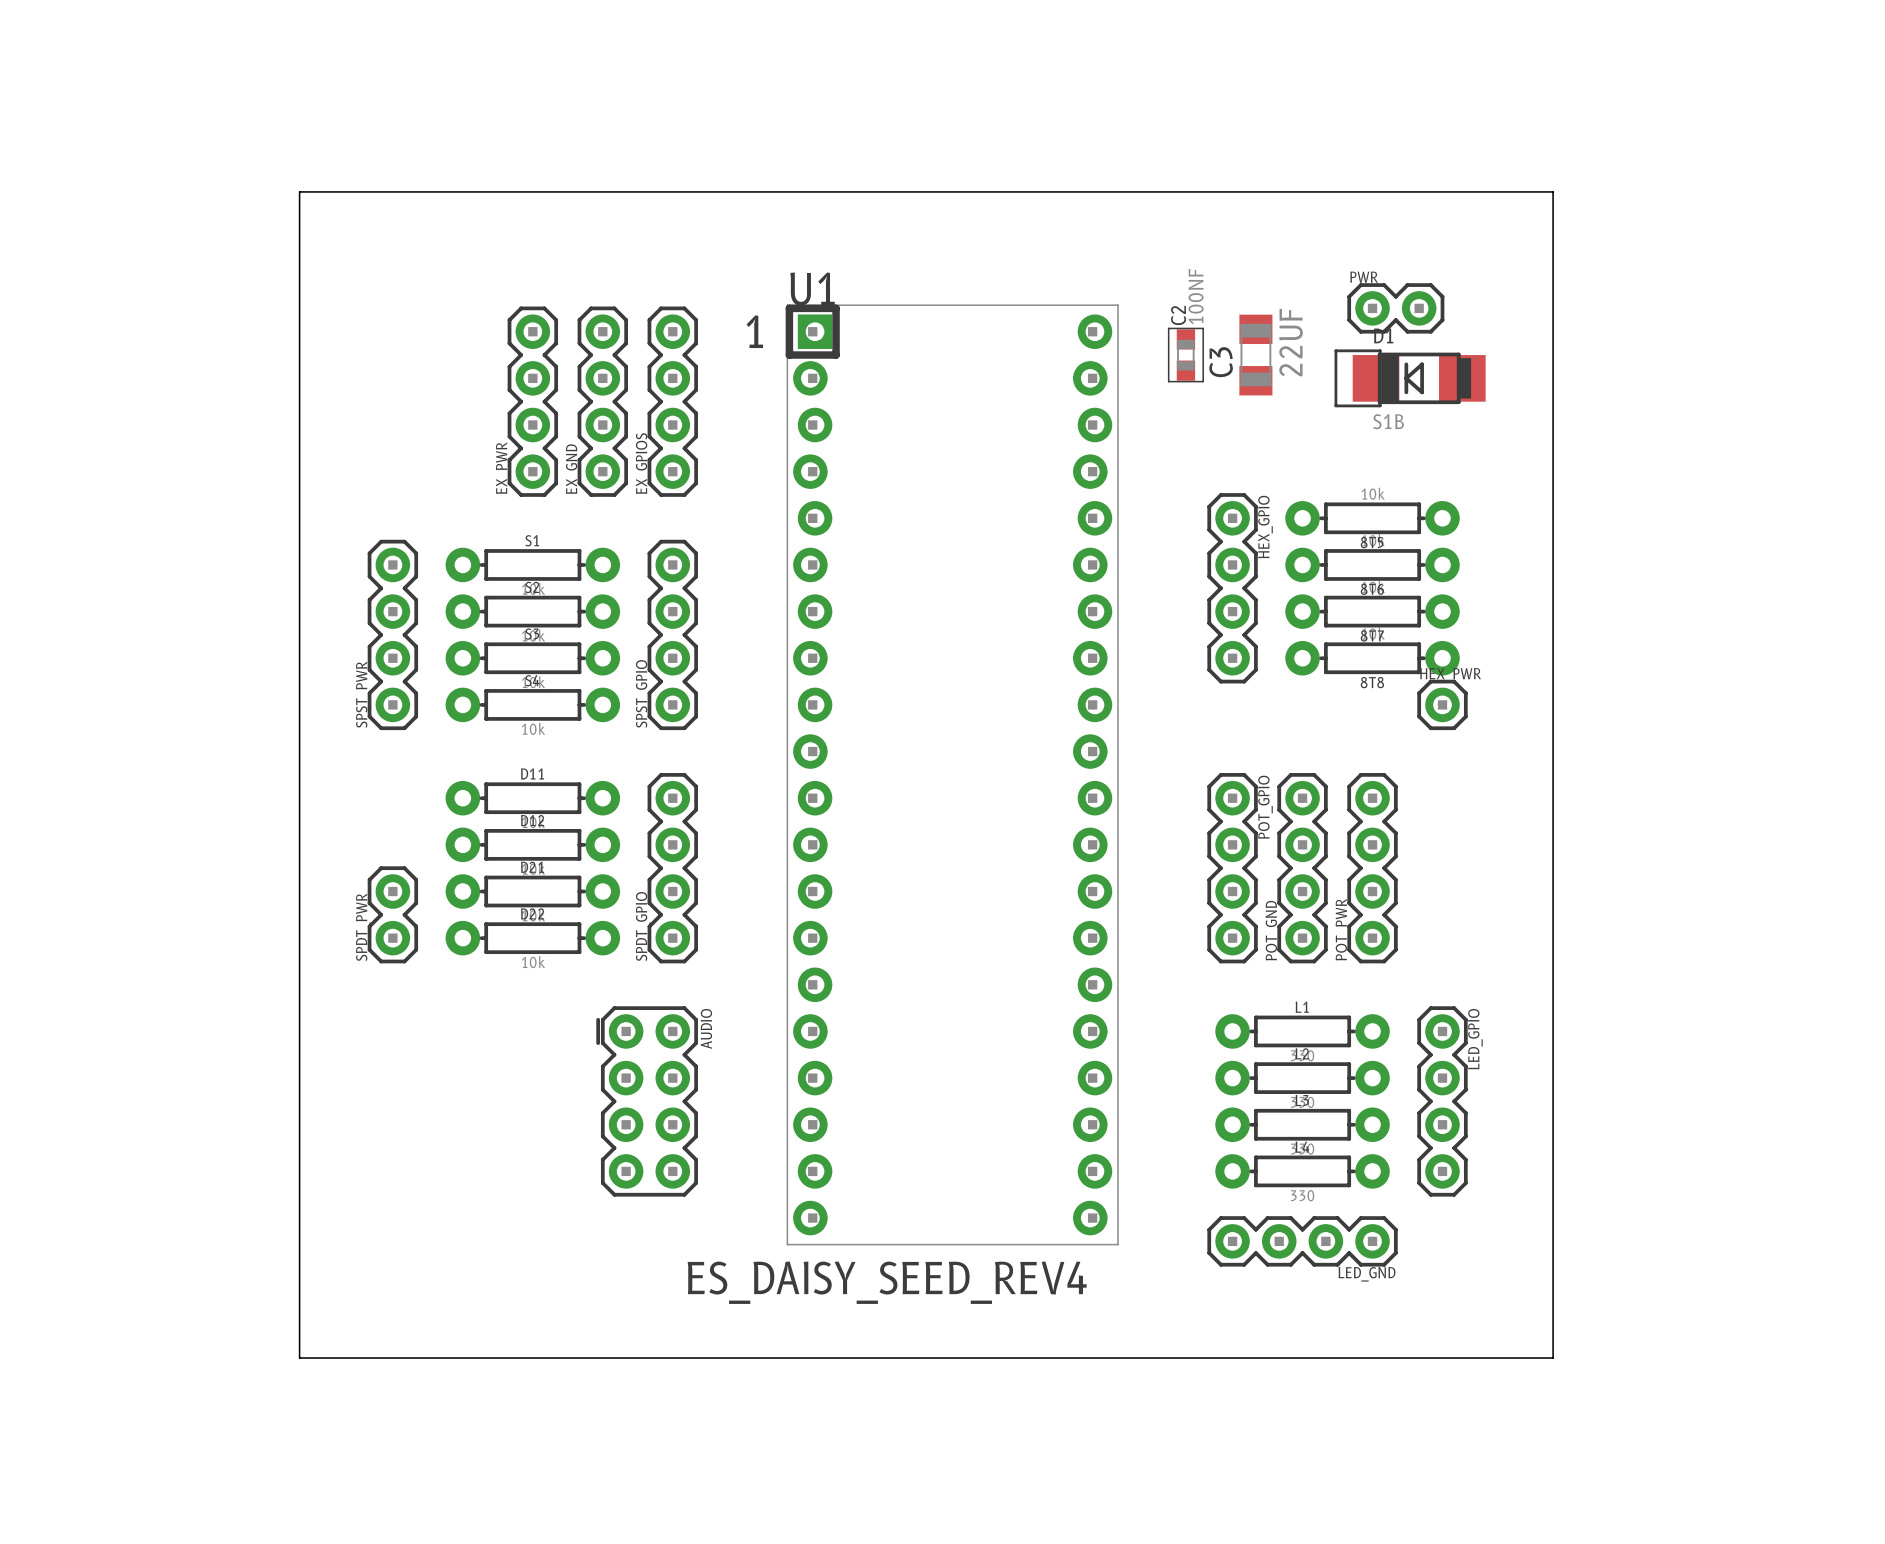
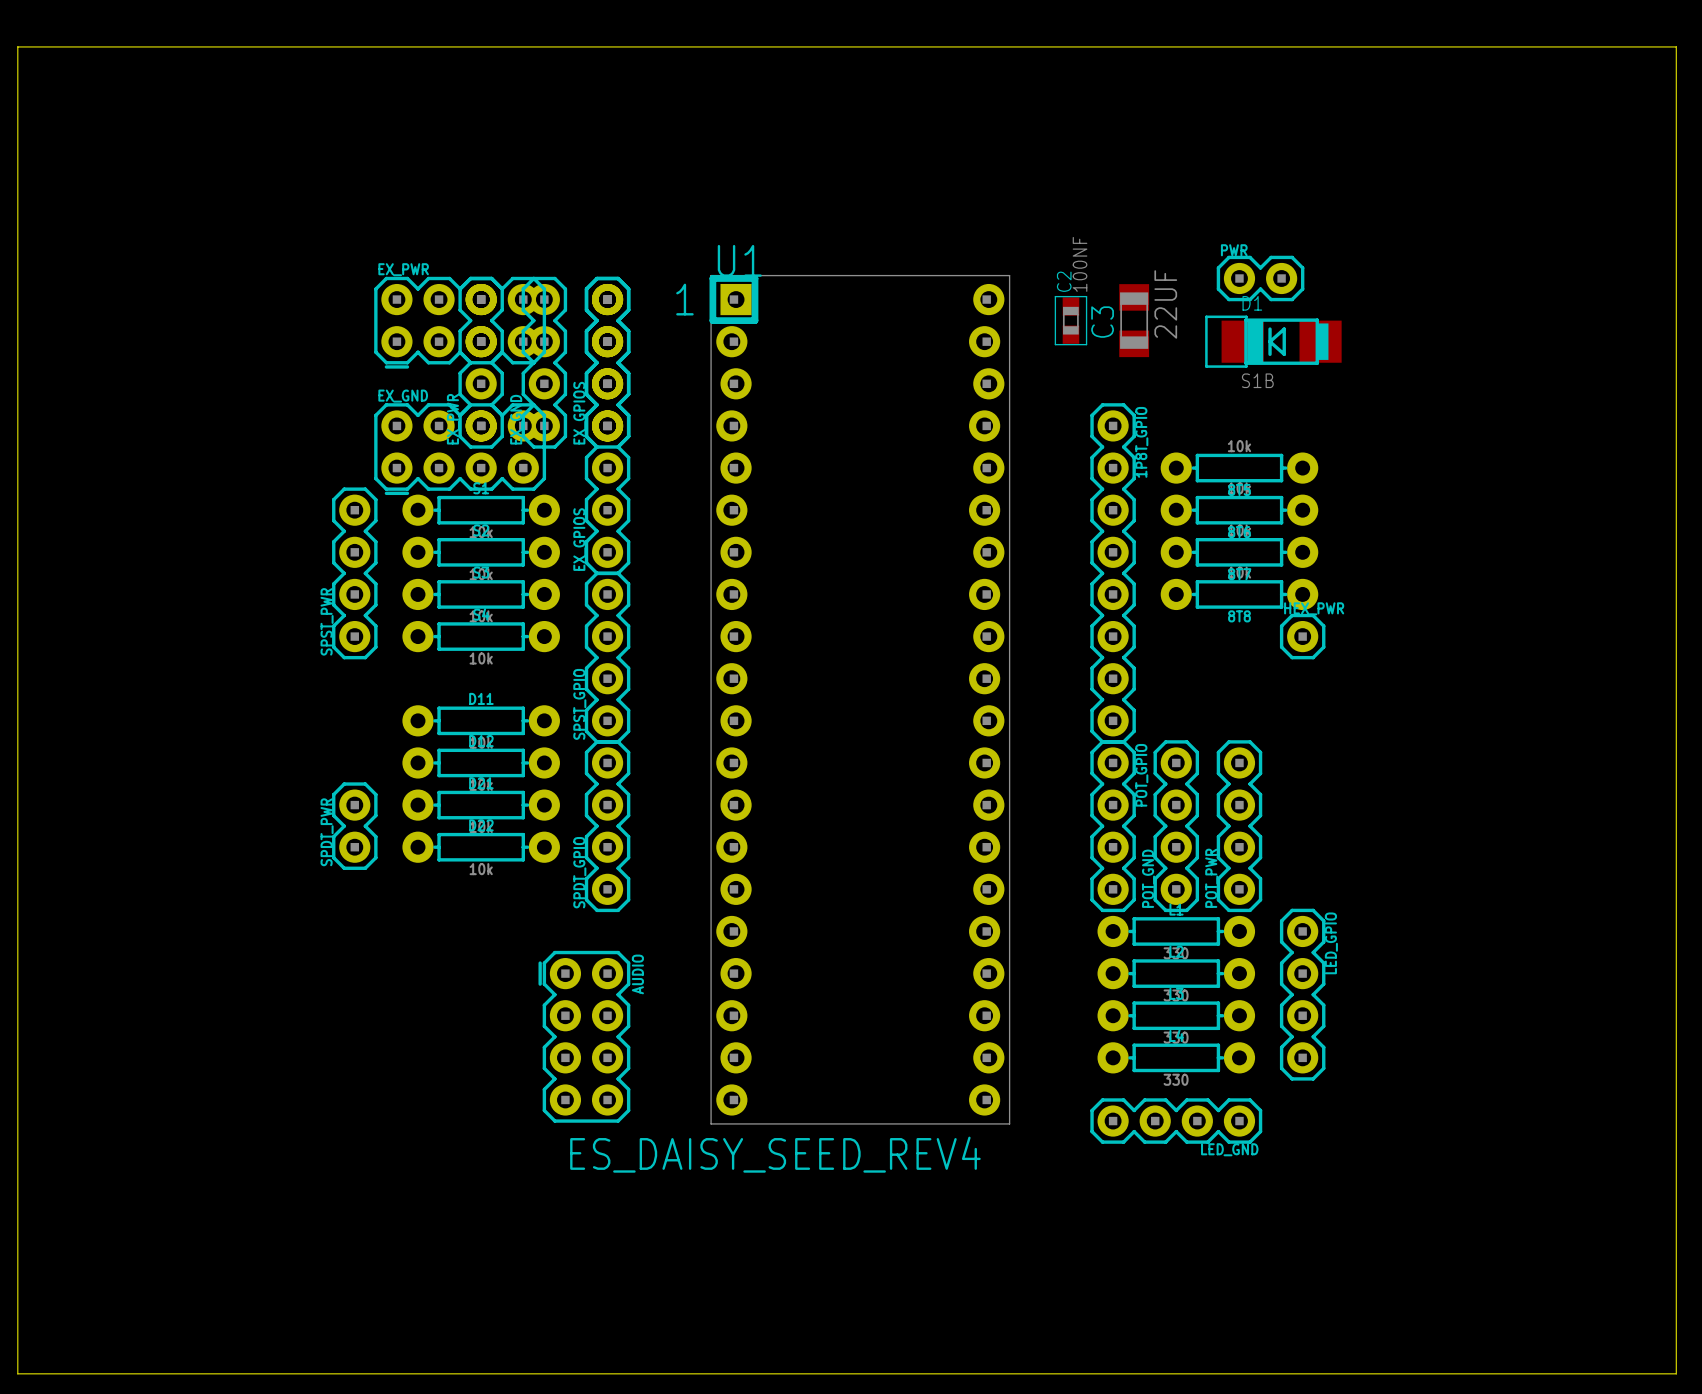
board edge: (299, 191) (1553, 191) (1553, 1358) (299, 1358) (299, 191) -> (17, 46) (17, 1373) (1676, 1373) (1676, 46) (17, 46)
EX_PWR: none -> (460, 322)
EX_GPIOS: none -> (607, 425)
EX_GND: none -> (460, 449)
HEX_GPIO: (1232, 588) -> none
SPST_GPIO position: (672, 634) -> (607, 657)
1P8T_GPIO: none -> (1113, 573)
SPDT_GPIO position: (672, 868) -> (607, 826)
POT_GPIO position: (1232, 868) -> (1113, 826)
POT_GND position: (1302, 868) -> (1176, 826)
POT_PWR position: (1372, 868) -> (1239, 826)
AUDIO position: (647, 1101) -> (584, 1036)

